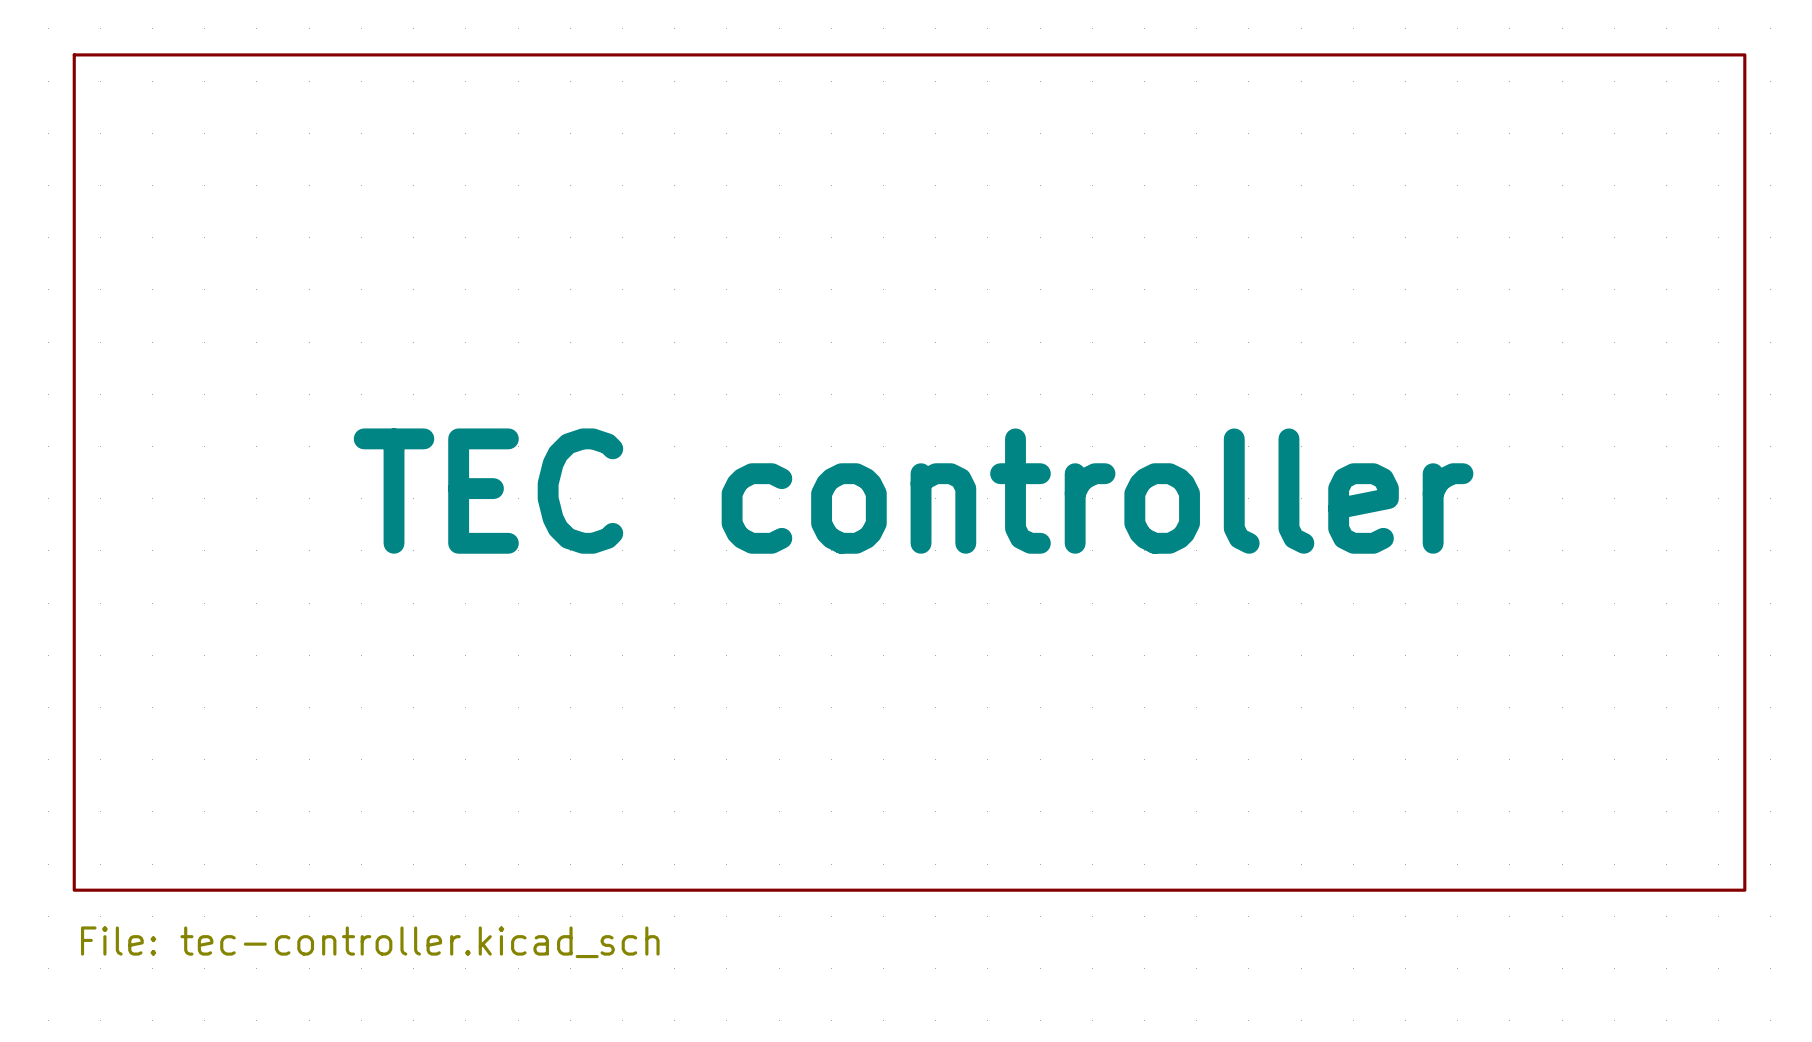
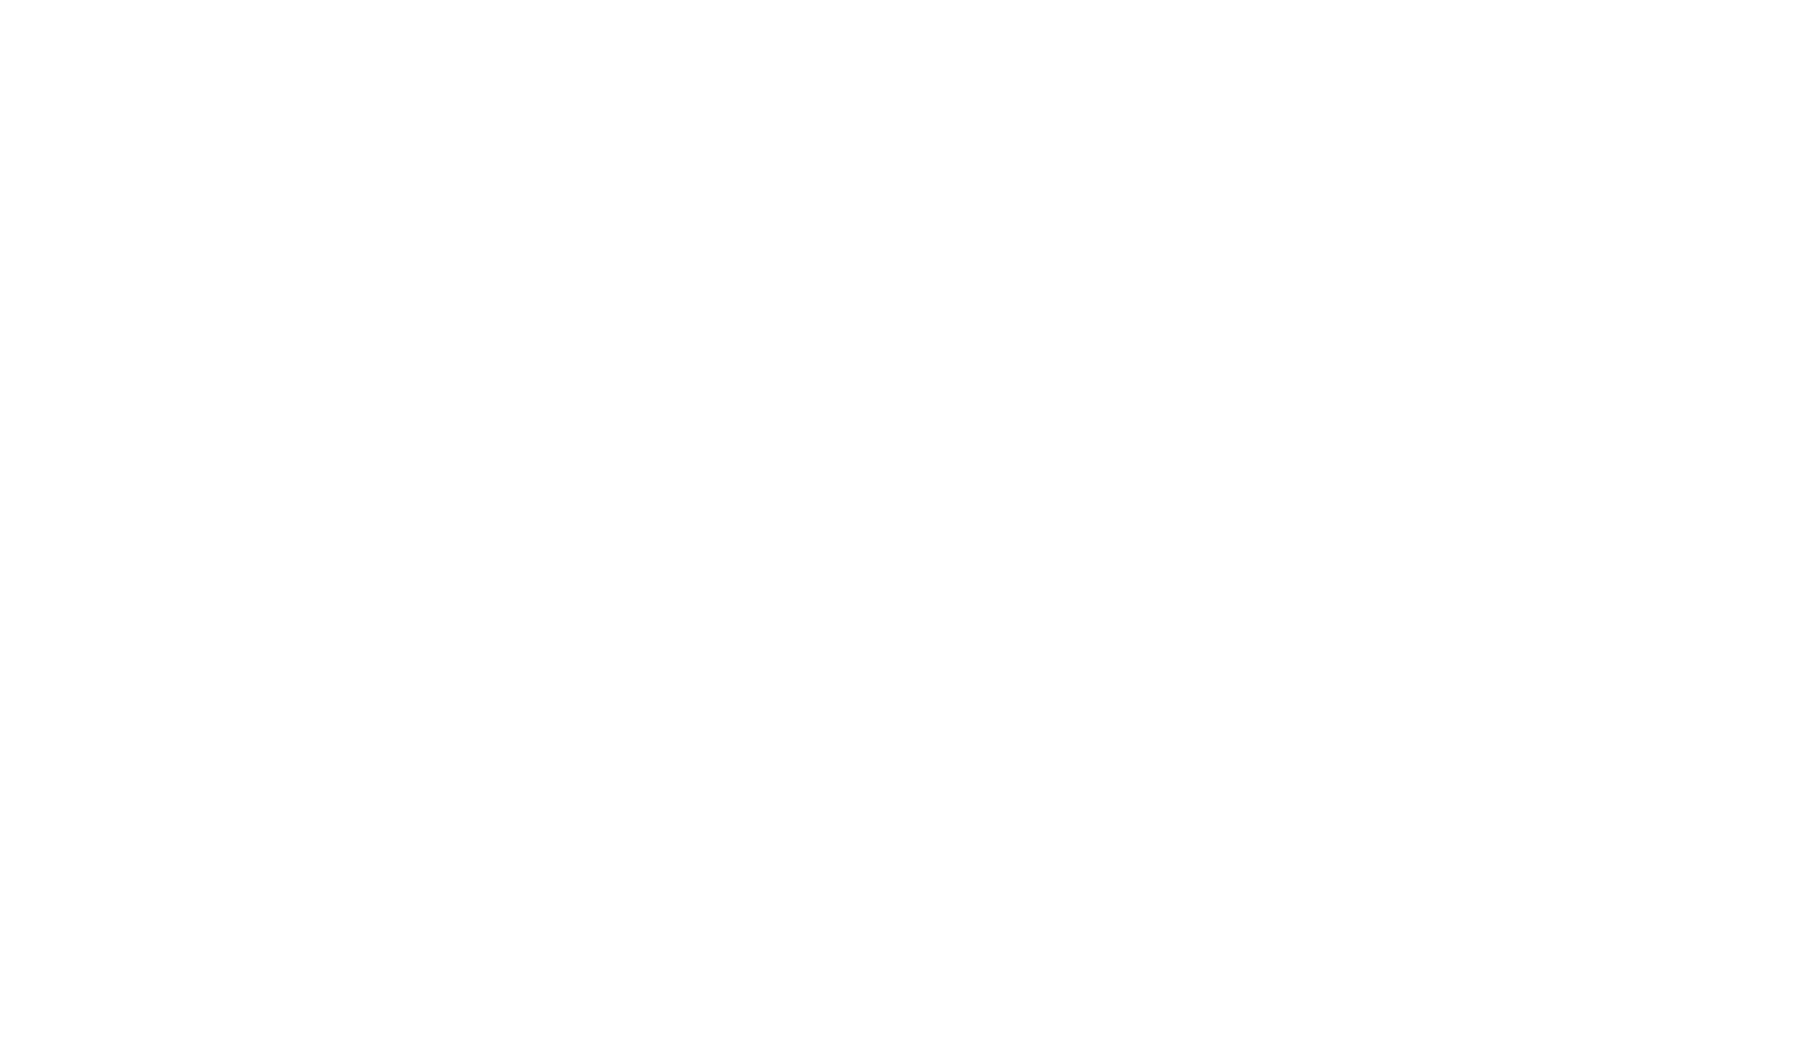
sheet TEC controller: File: tec-controller.kicad_sch (909, 472) -> none

